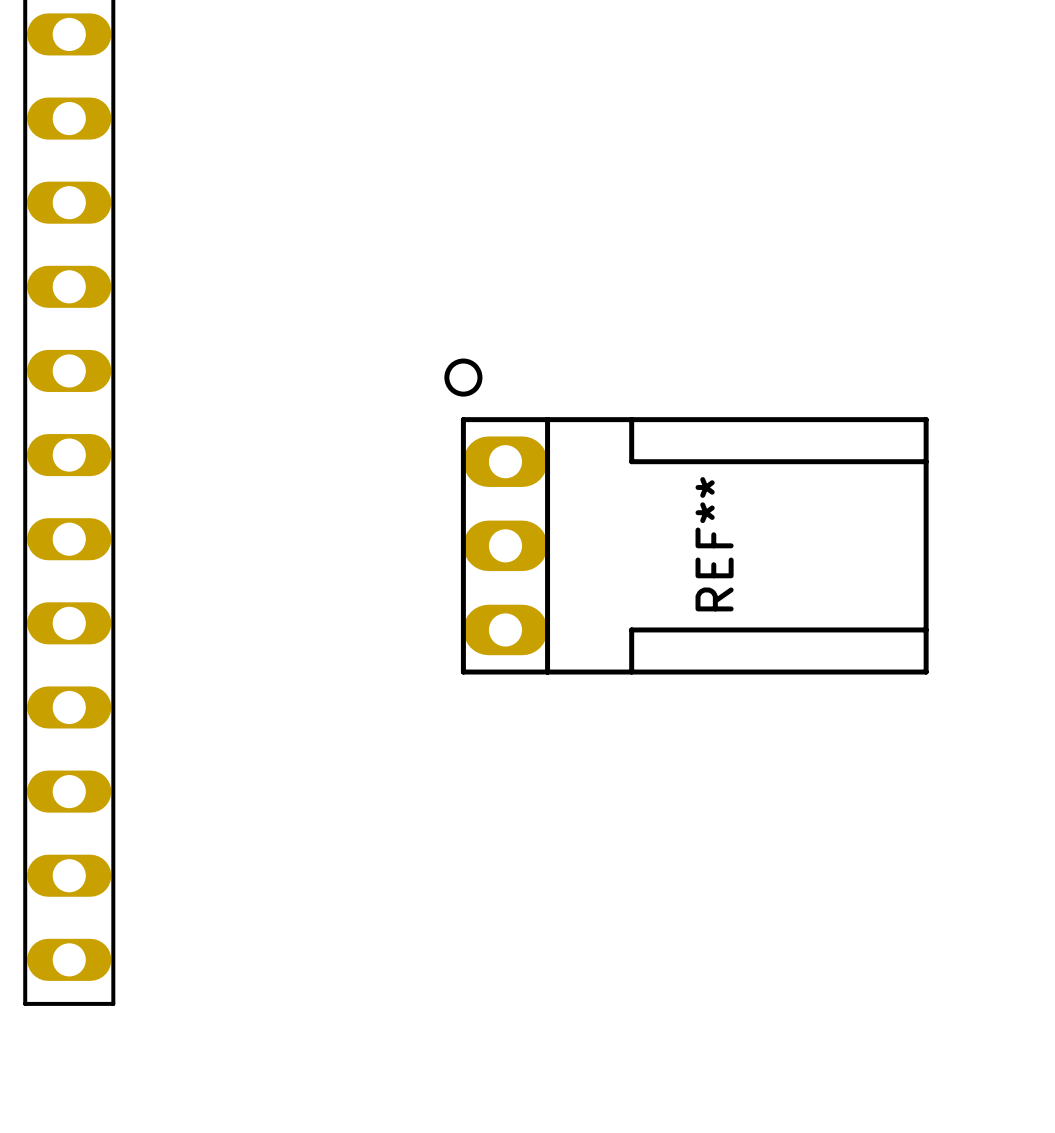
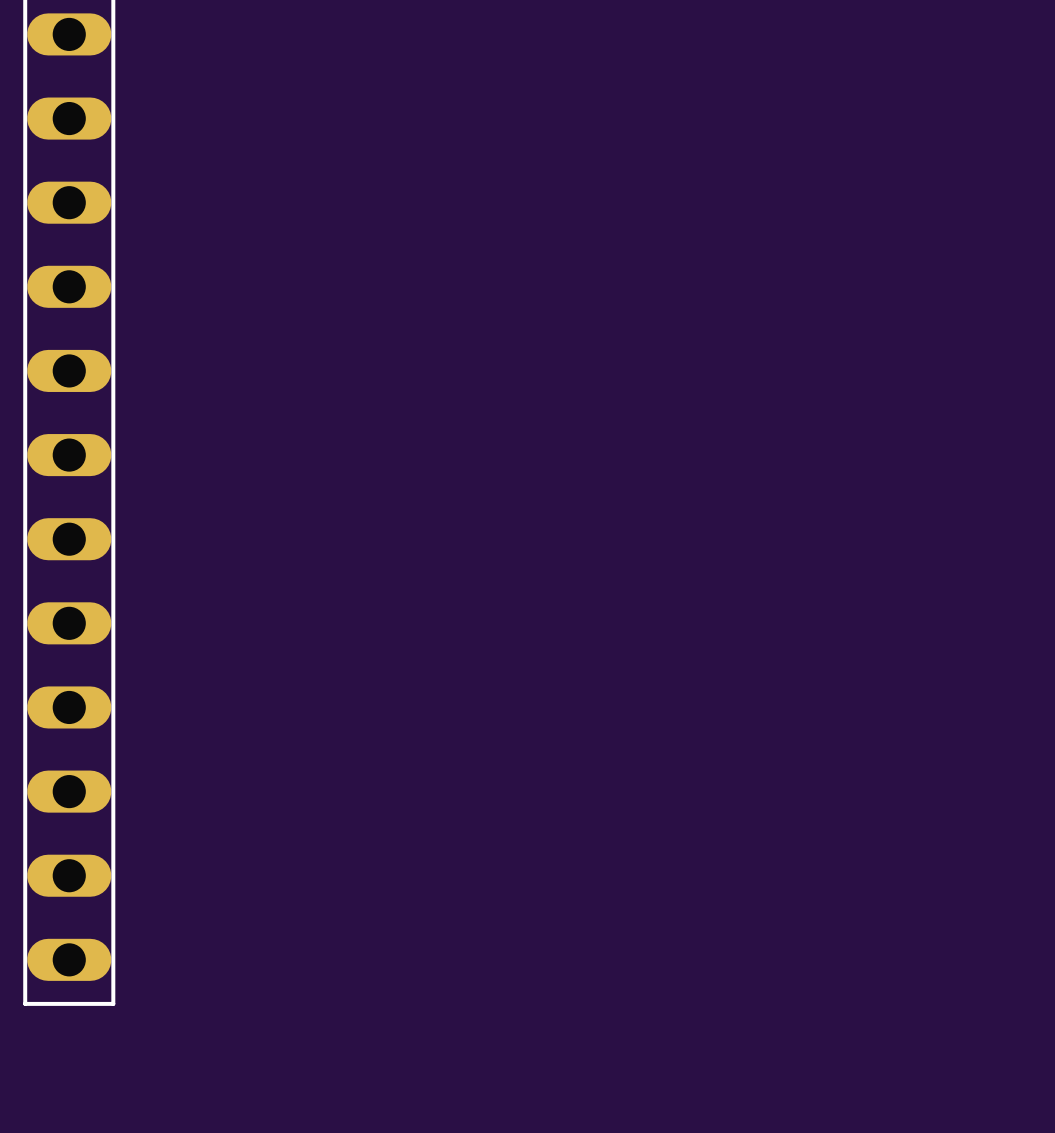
part: (686, 516) -> none

